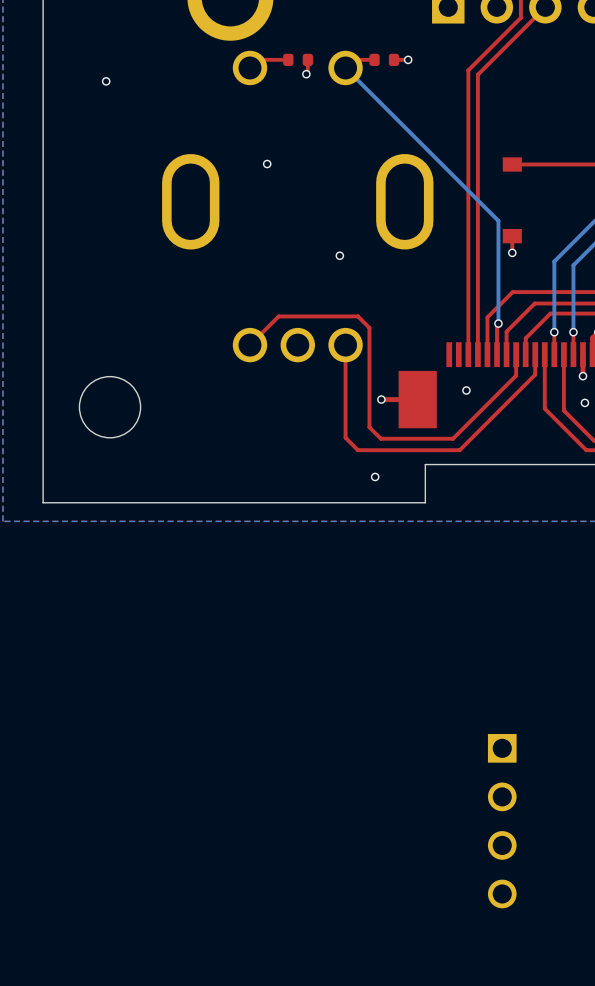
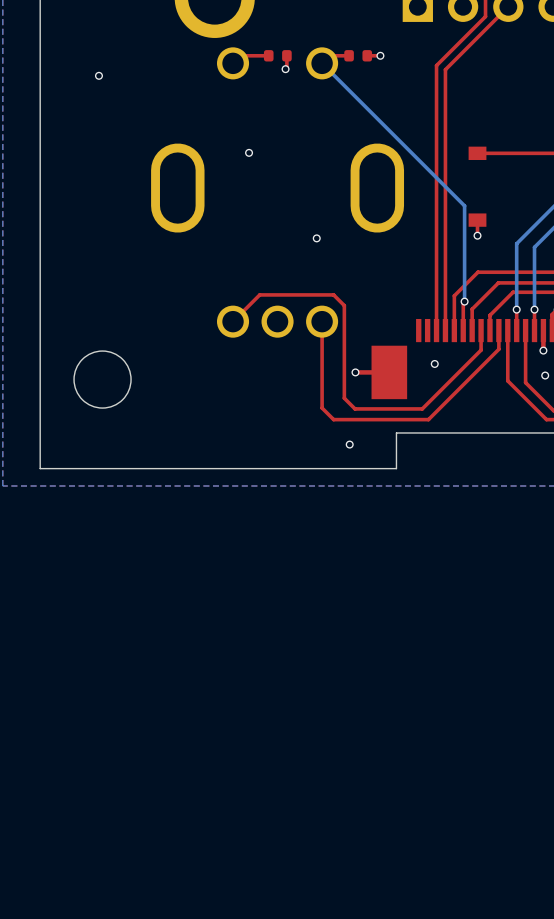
part: (502, 821) -> none

